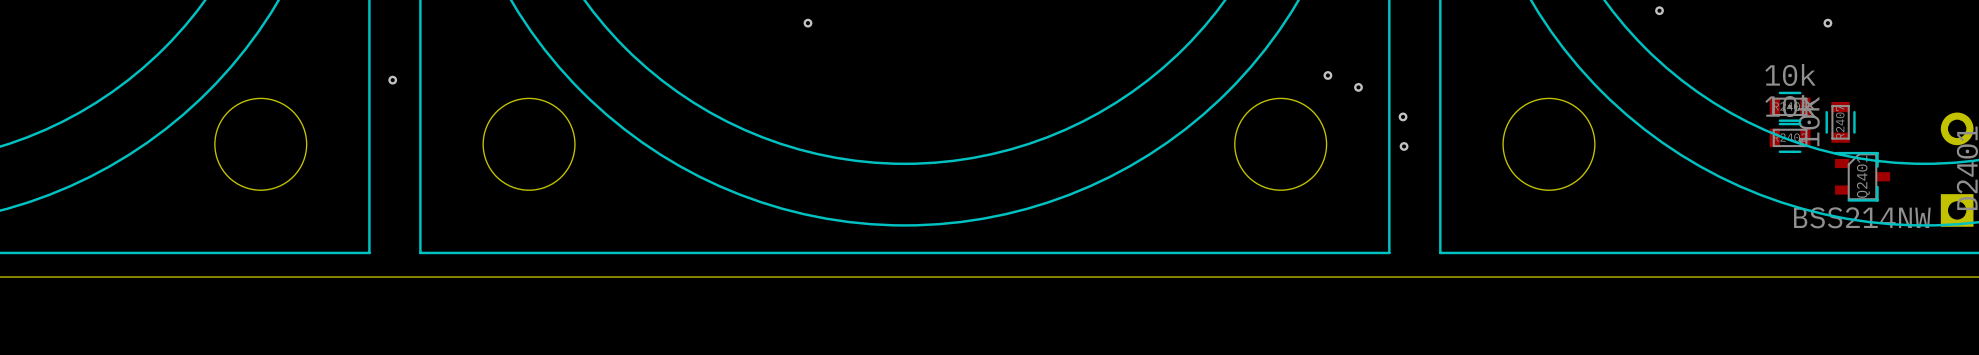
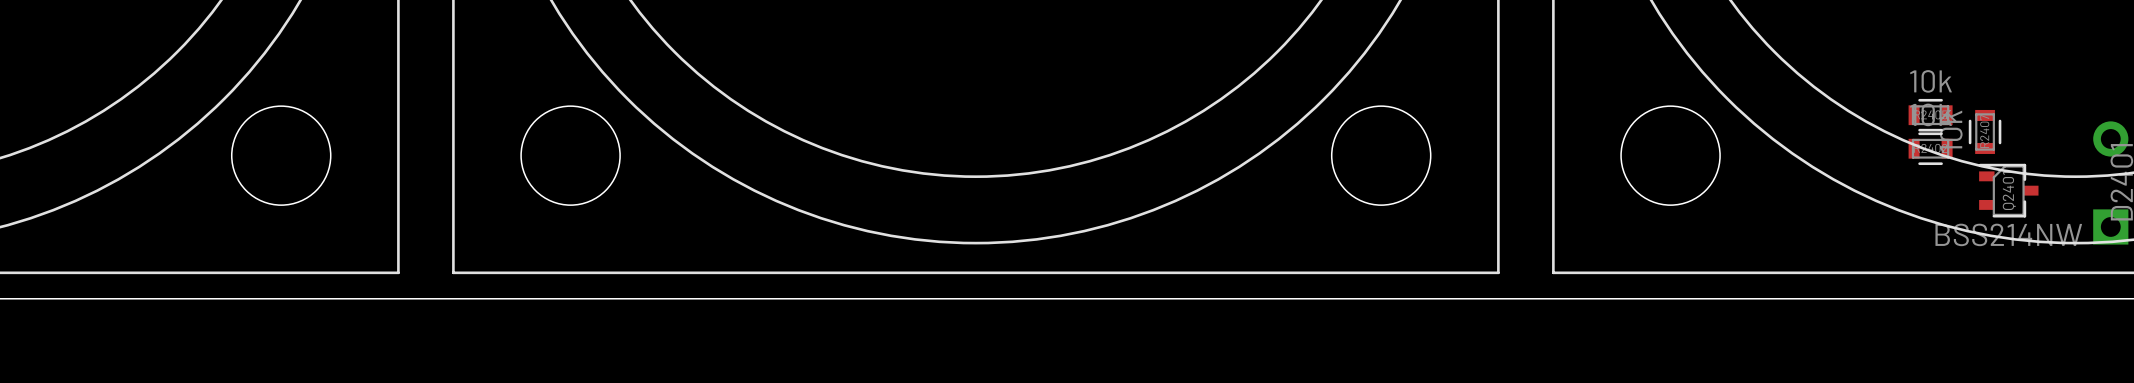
via: (1659, 10) -> none
via: (807, 23) -> none
via: (1827, 23) -> none
via: (1327, 75) -> none
via: (392, 80) -> none
via: (1358, 87) -> none
via: (1403, 116) -> none
via: (1404, 146) -> none

